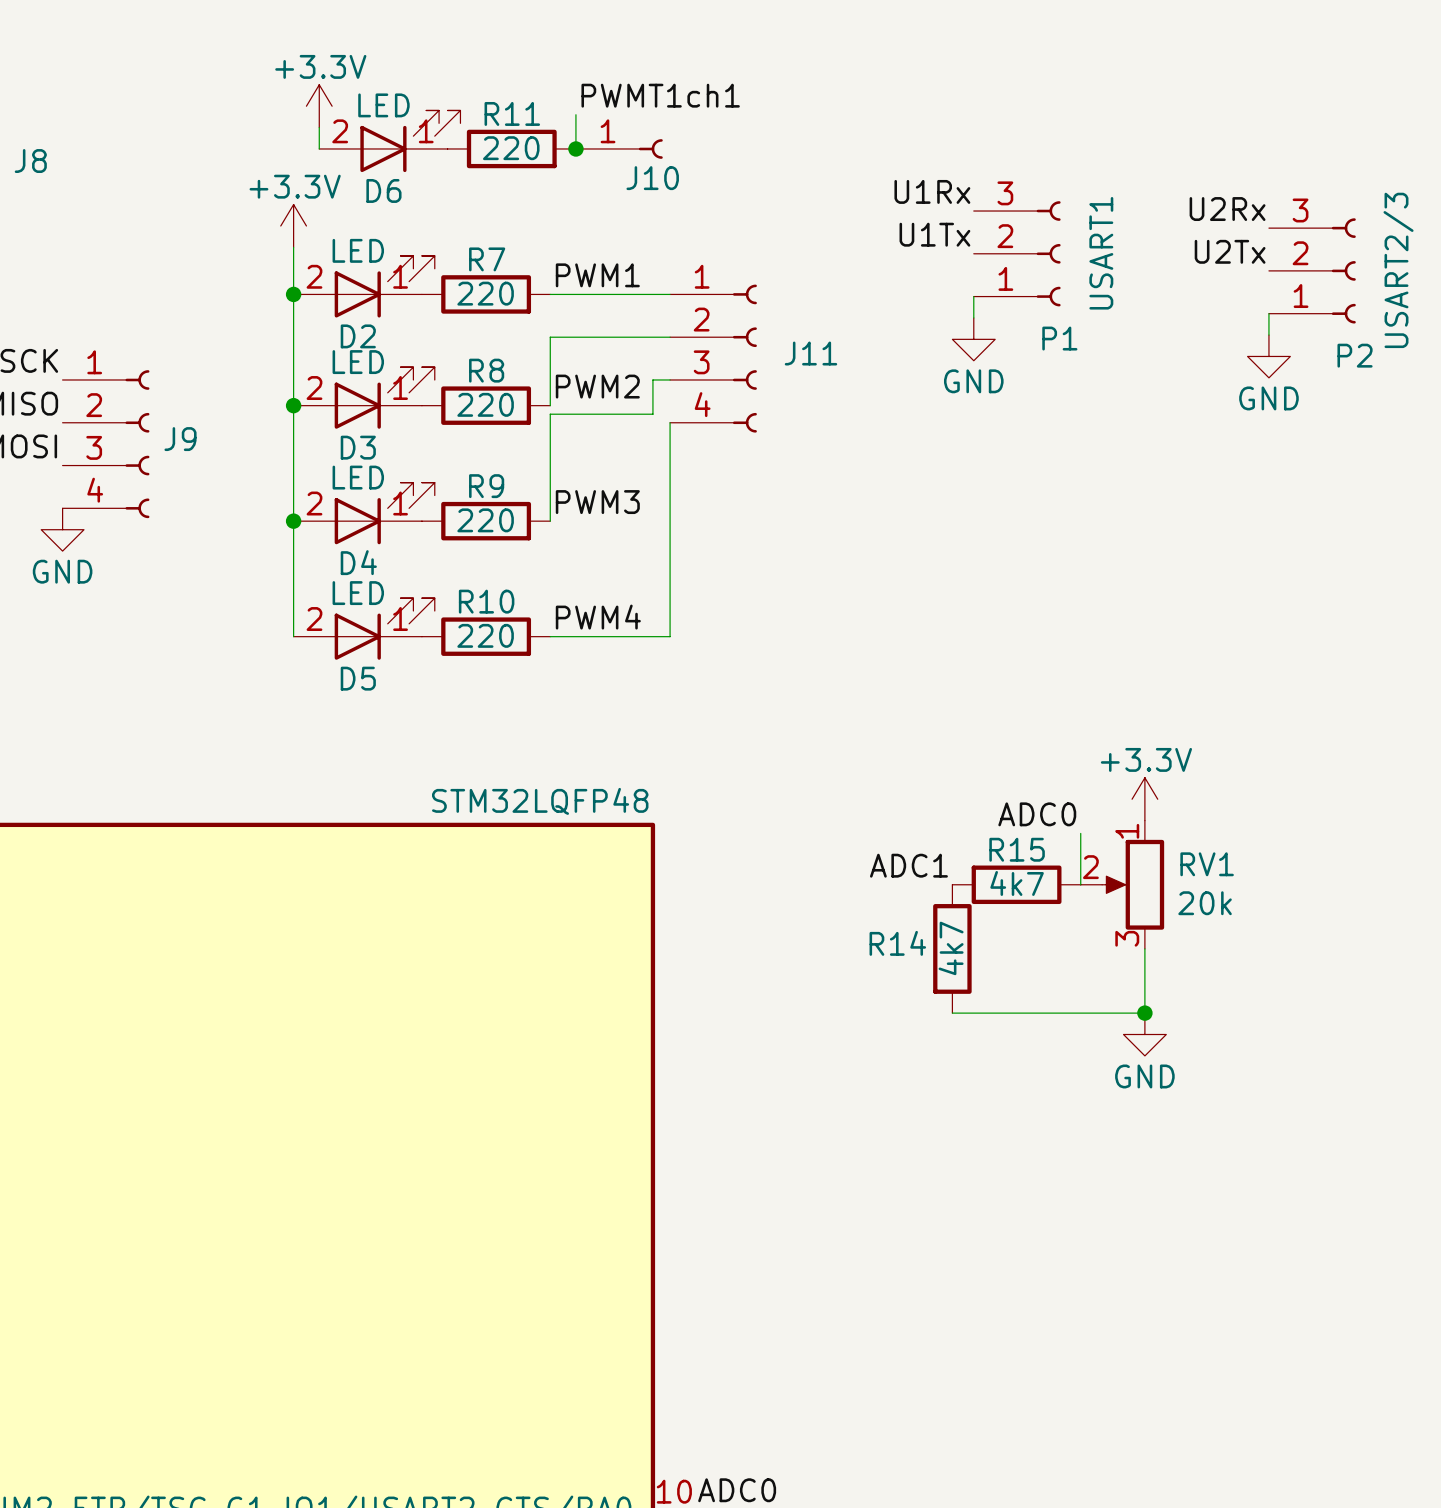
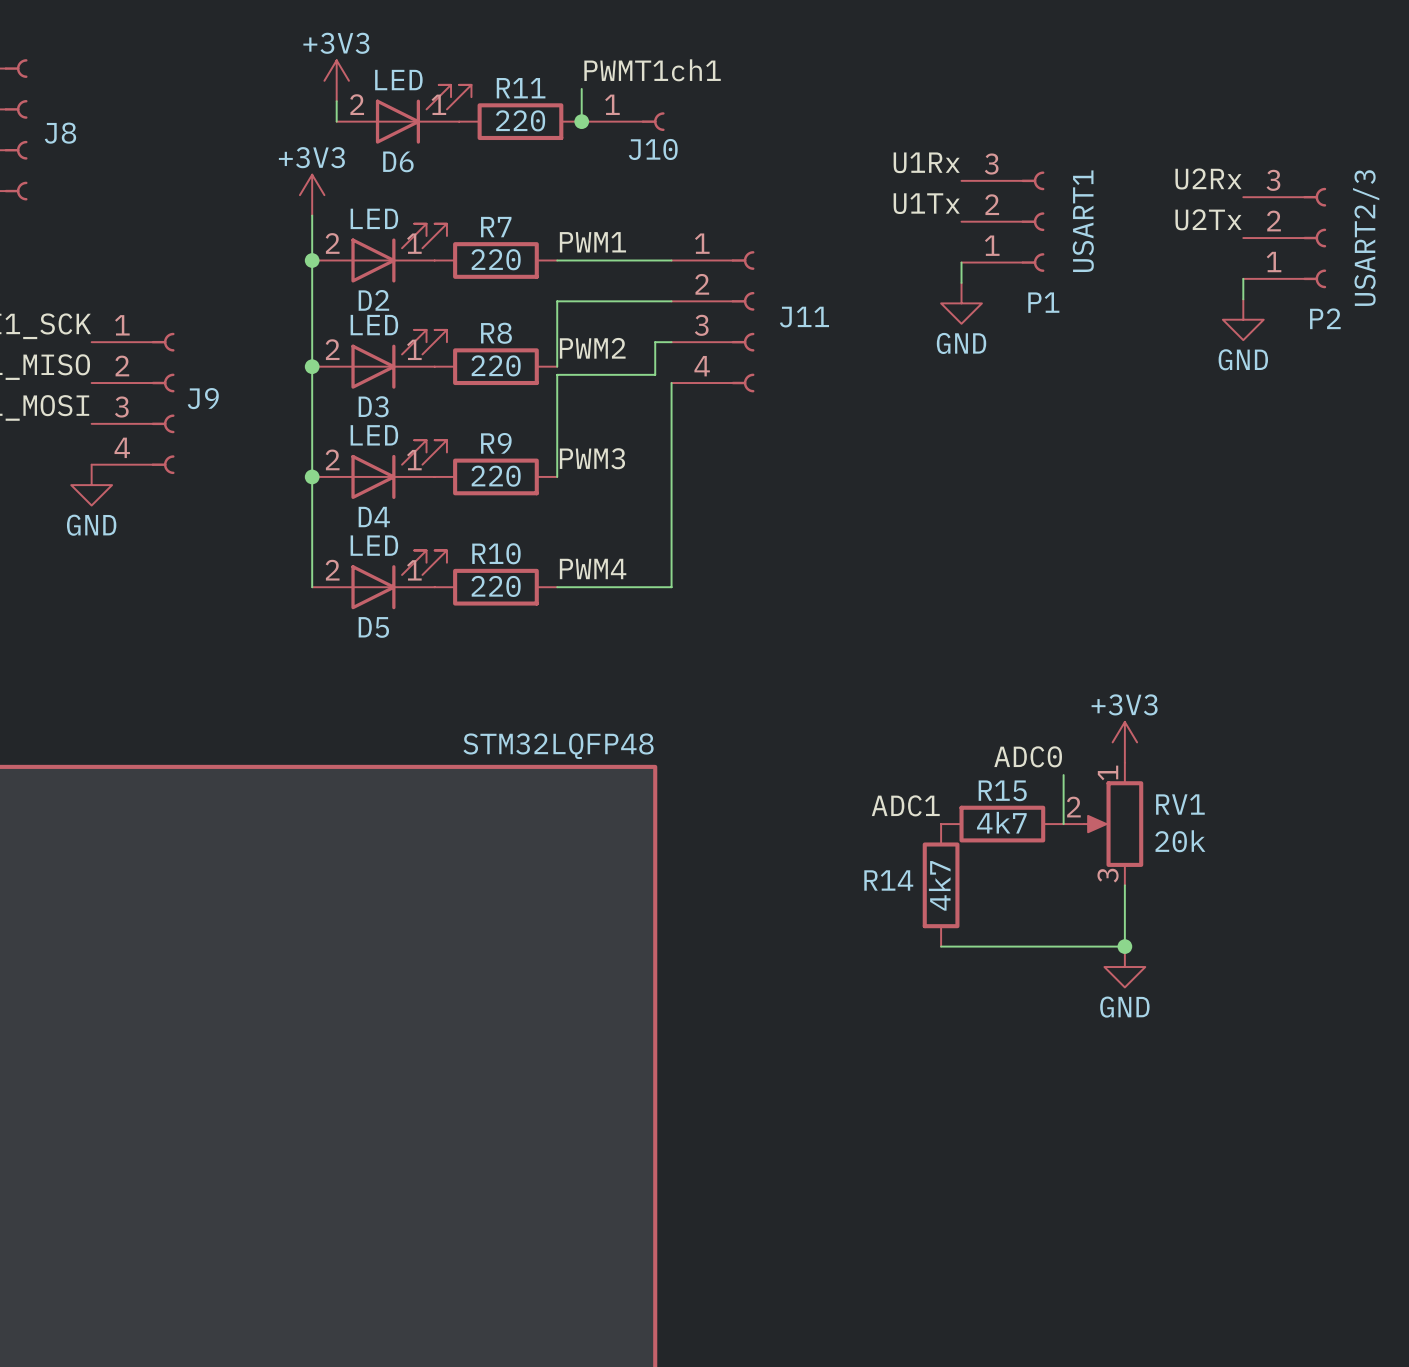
power symbol: +3.3V (319, 106) -> +3V3 (336, 80)
power symbol: +3.3V (293, 225) -> +3V3 (312, 195)
power symbol: +3.3V (1144, 799) -> +3V3 (1124, 742)

